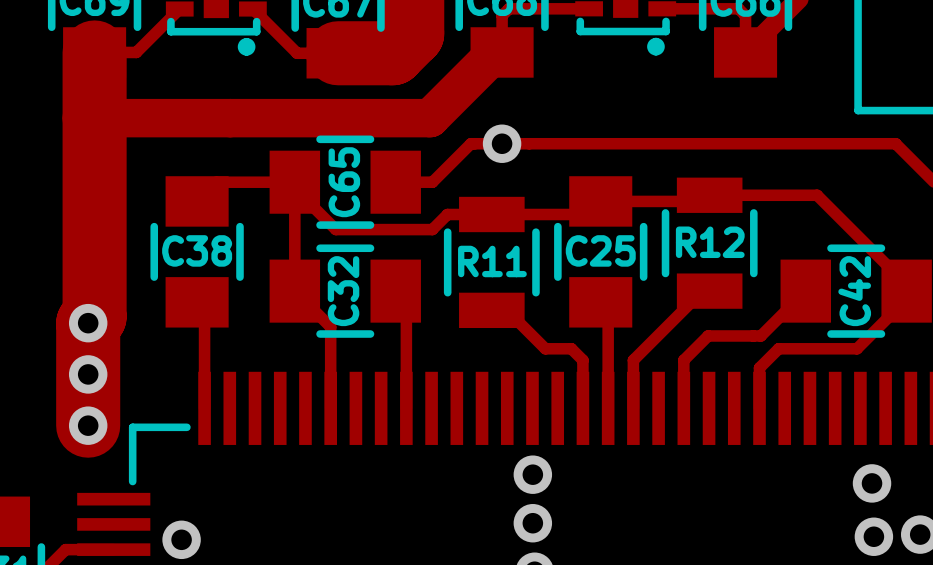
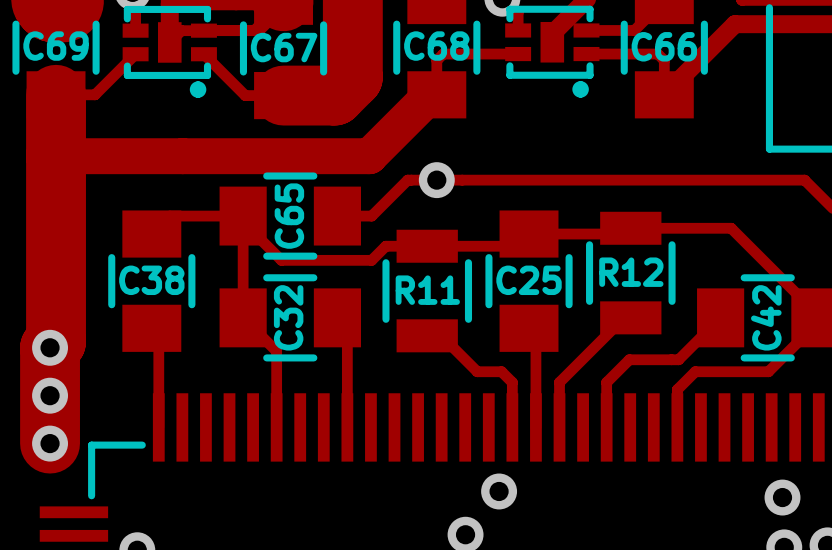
via position: (532, 474) -> (499, 491)

